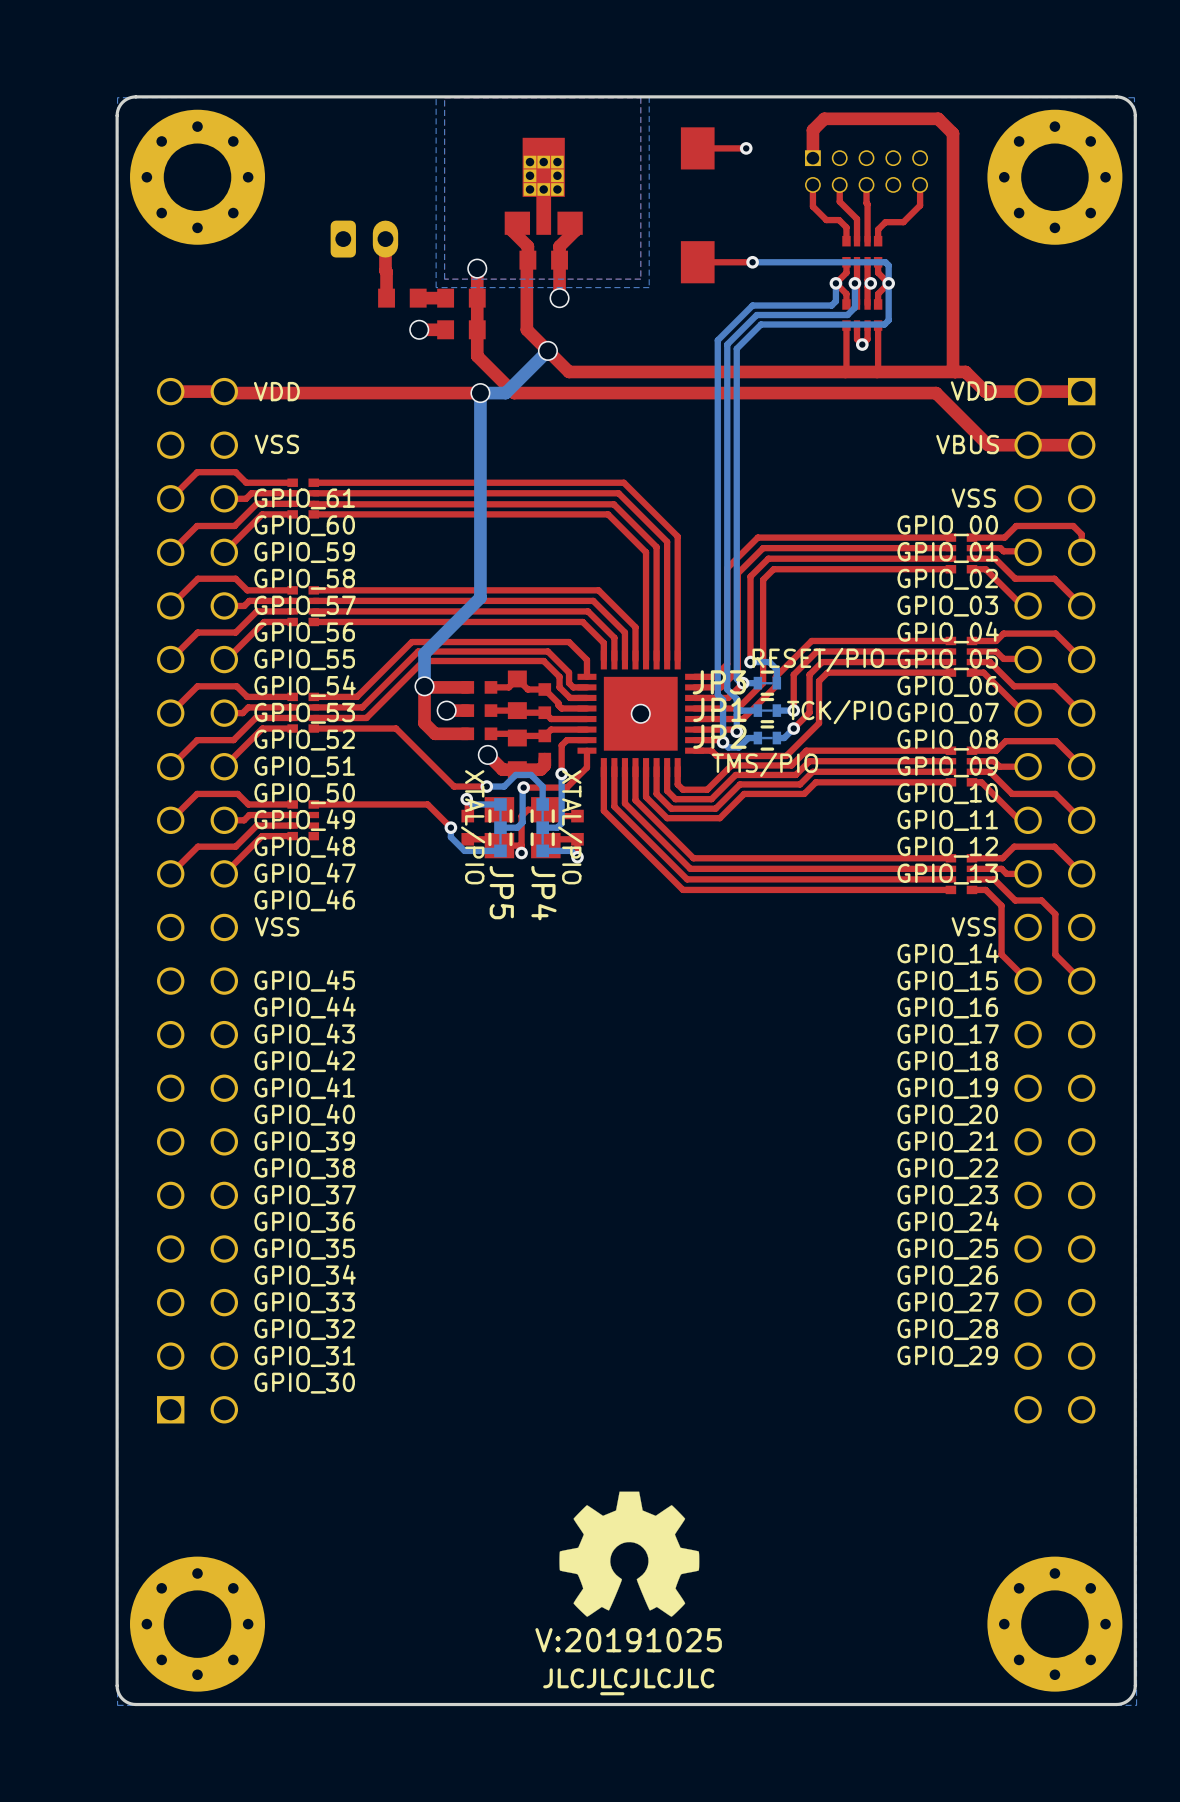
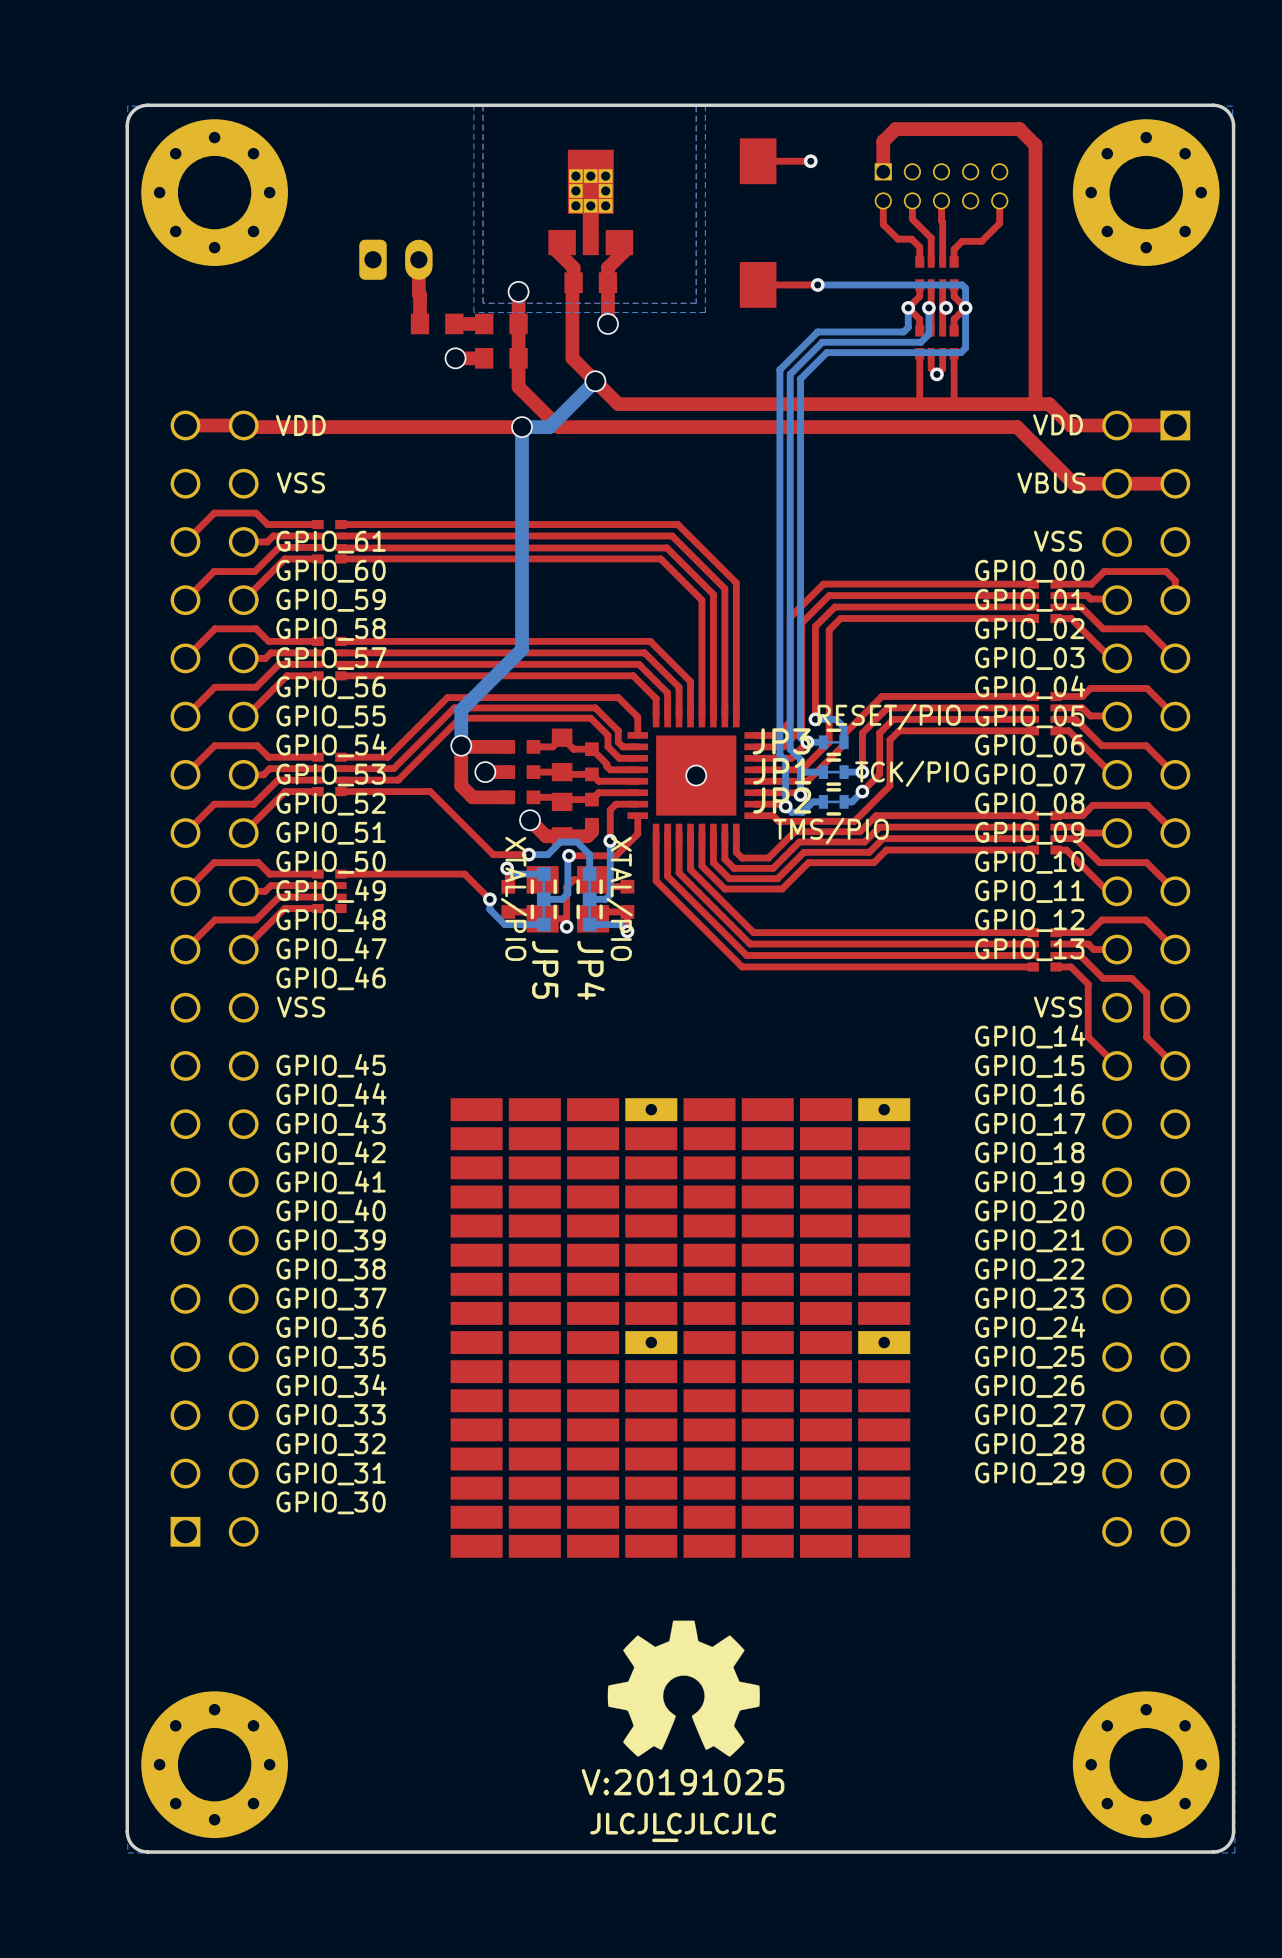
part: none -> (563, 1211)
part: none -> (796, 1211)
part: none -> (563, 1444)
part: none -> (796, 1444)

